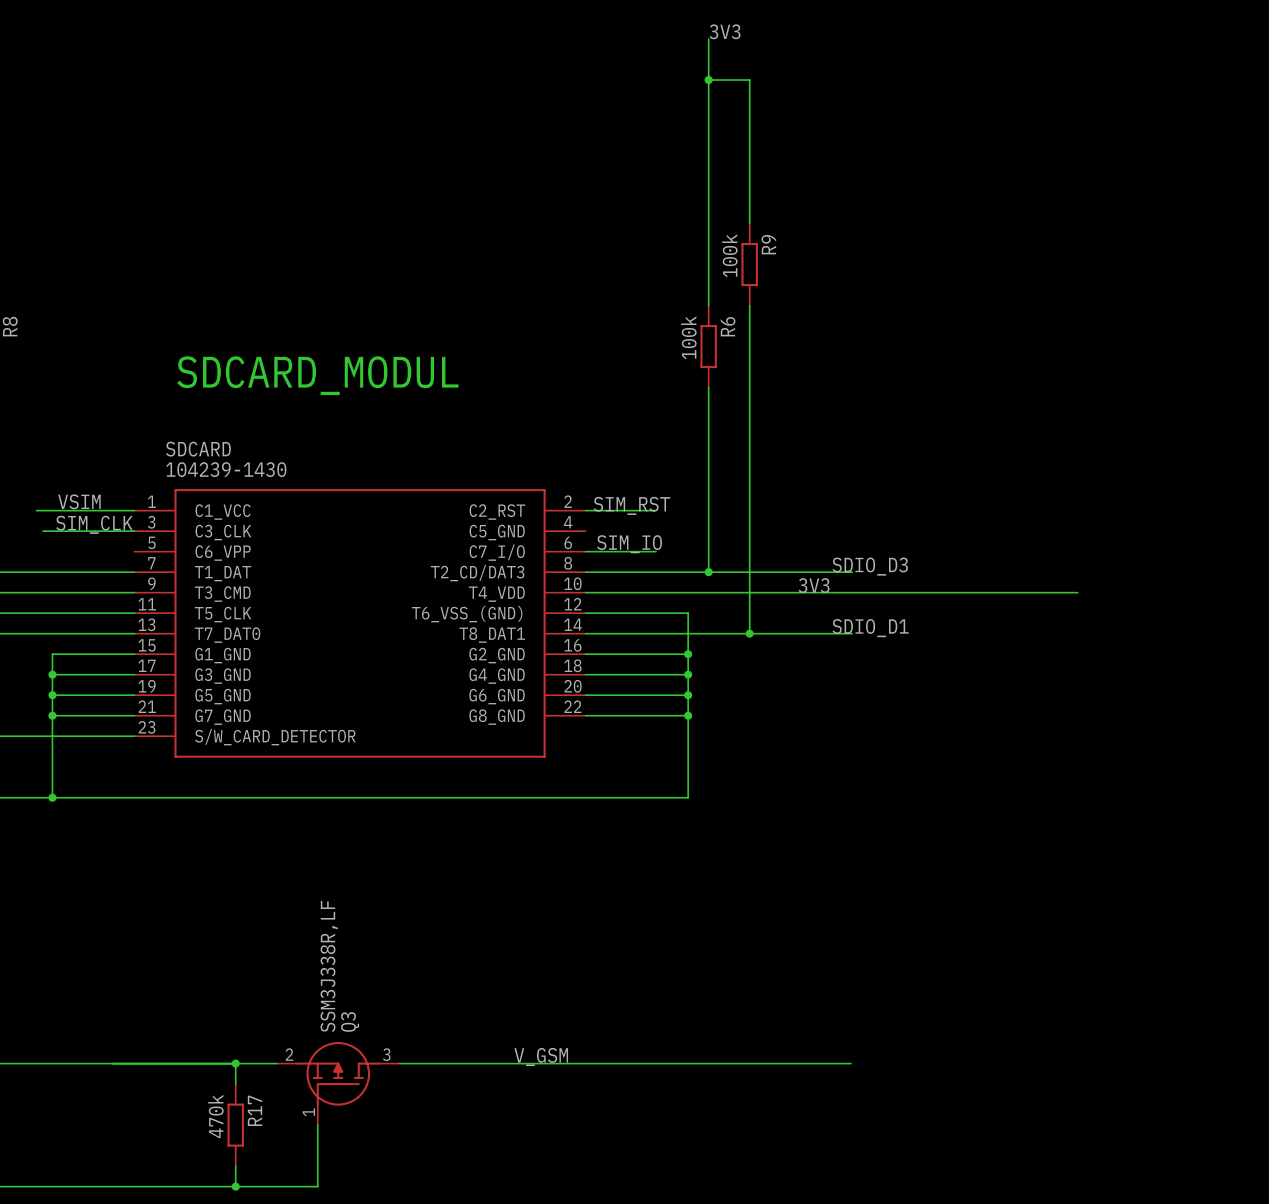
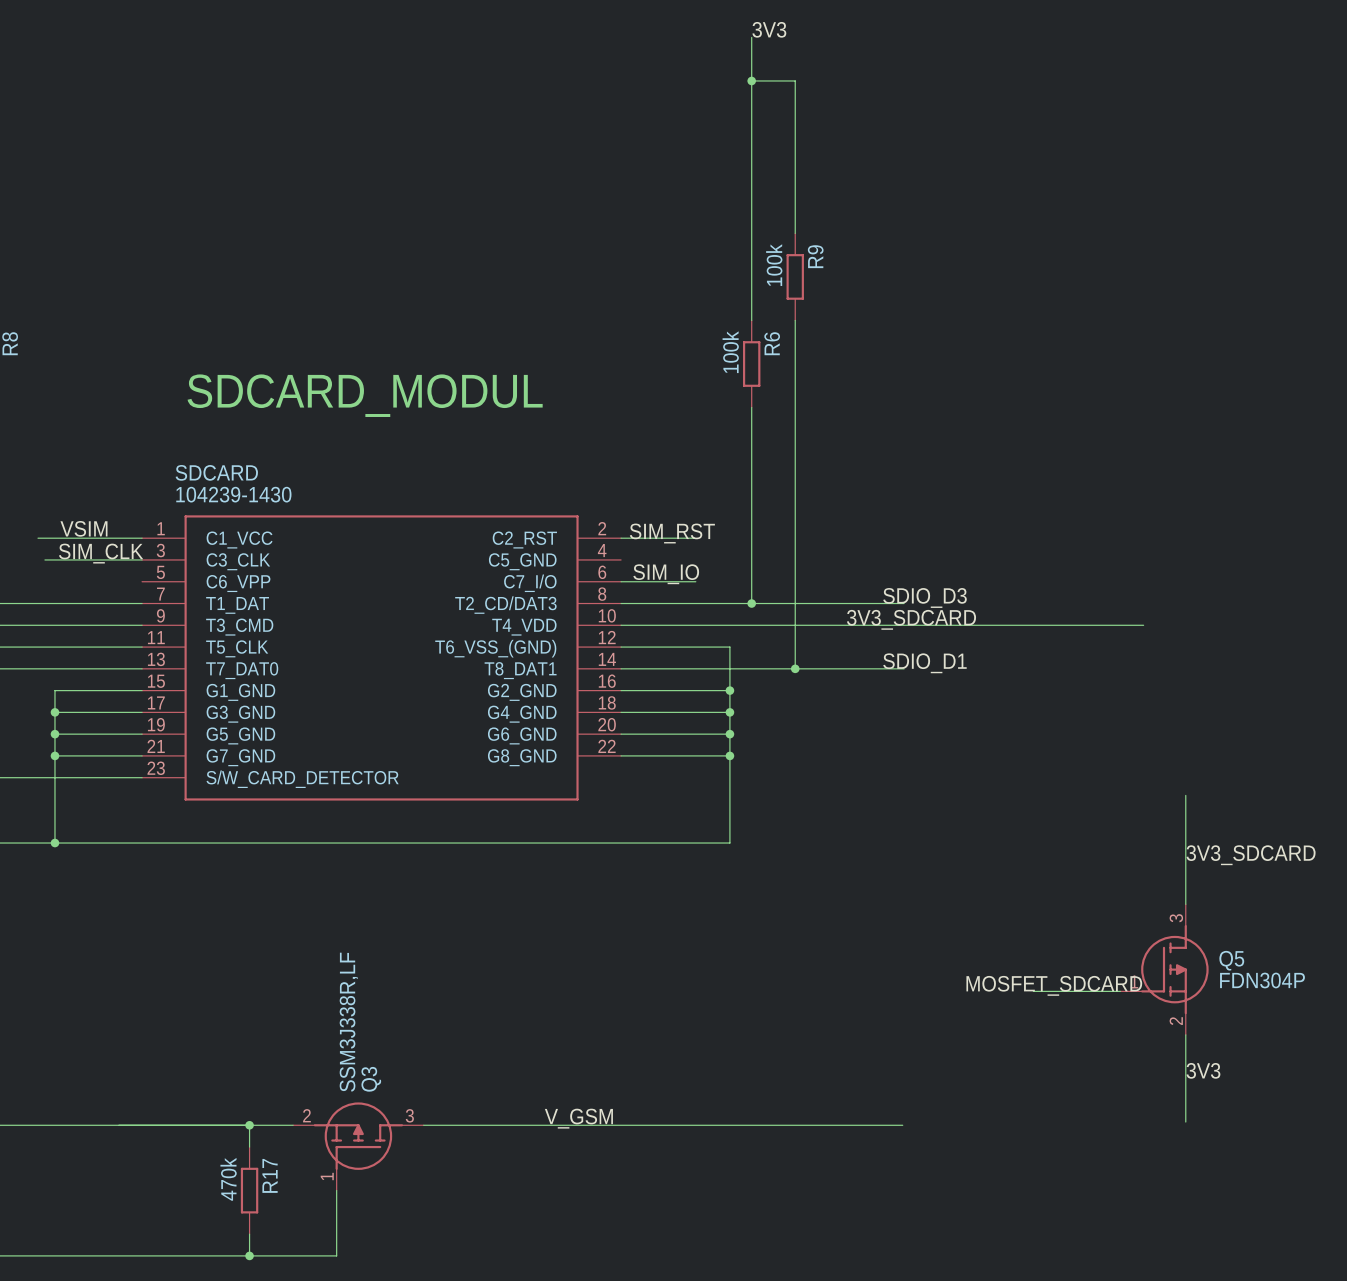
label: 3V3 (814, 585) -> 3V3_SDCARD (911, 619)
wire: none -> (1185, 795) (1185, 904)
label: none -> 3V3_SDCARD (1251, 855)
Q5: none -> FDN304P (1164, 969)
label: none -> MOSFET_SDCARD (1054, 985)
wire: none -> (1033, 991) (1120, 991)
wire: none -> (1185, 1034) (1185, 1122)
label: none -> 3V3 (1203, 1070)

